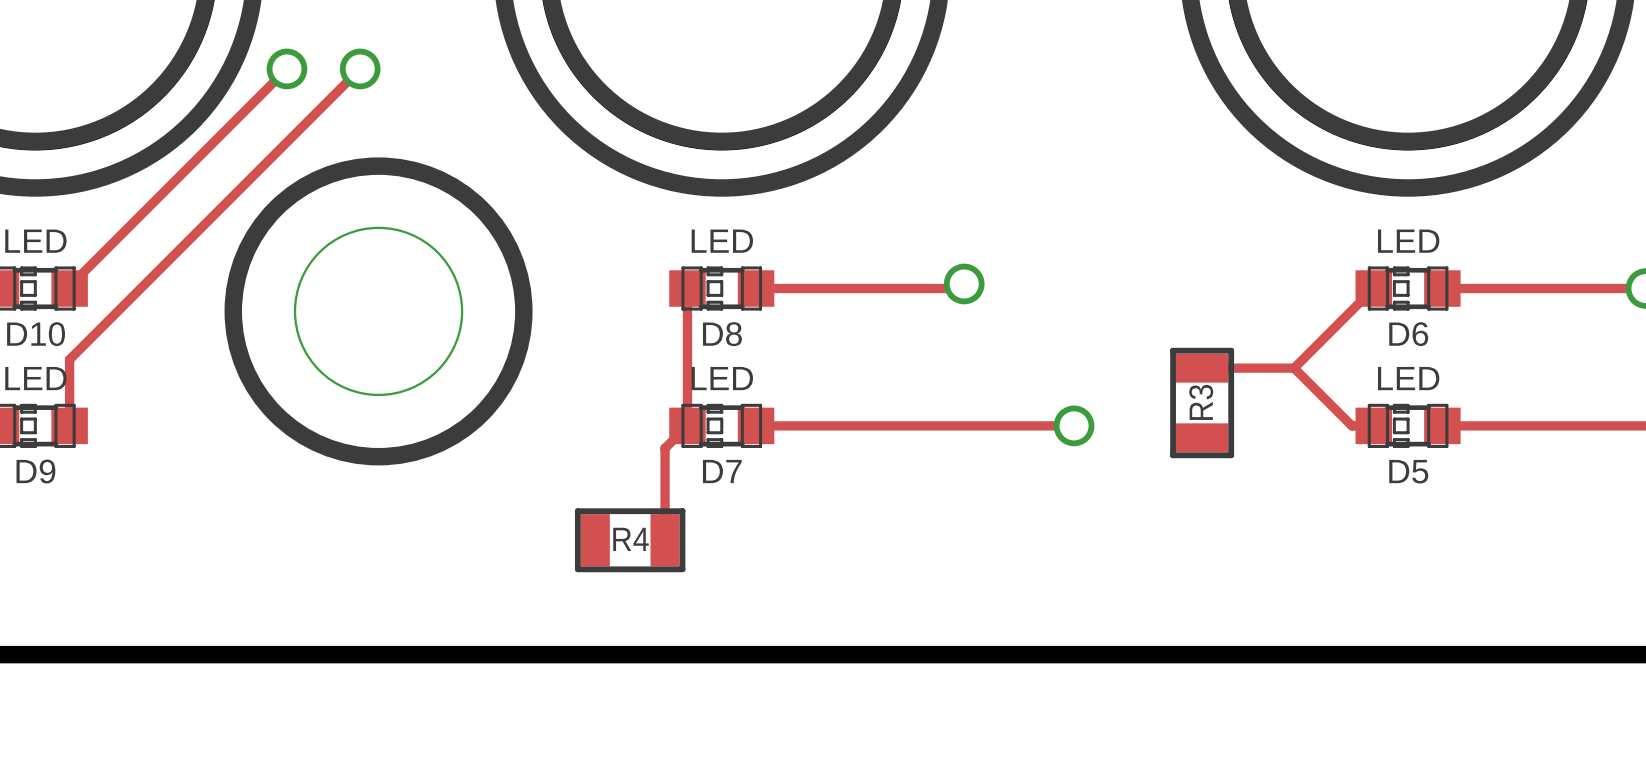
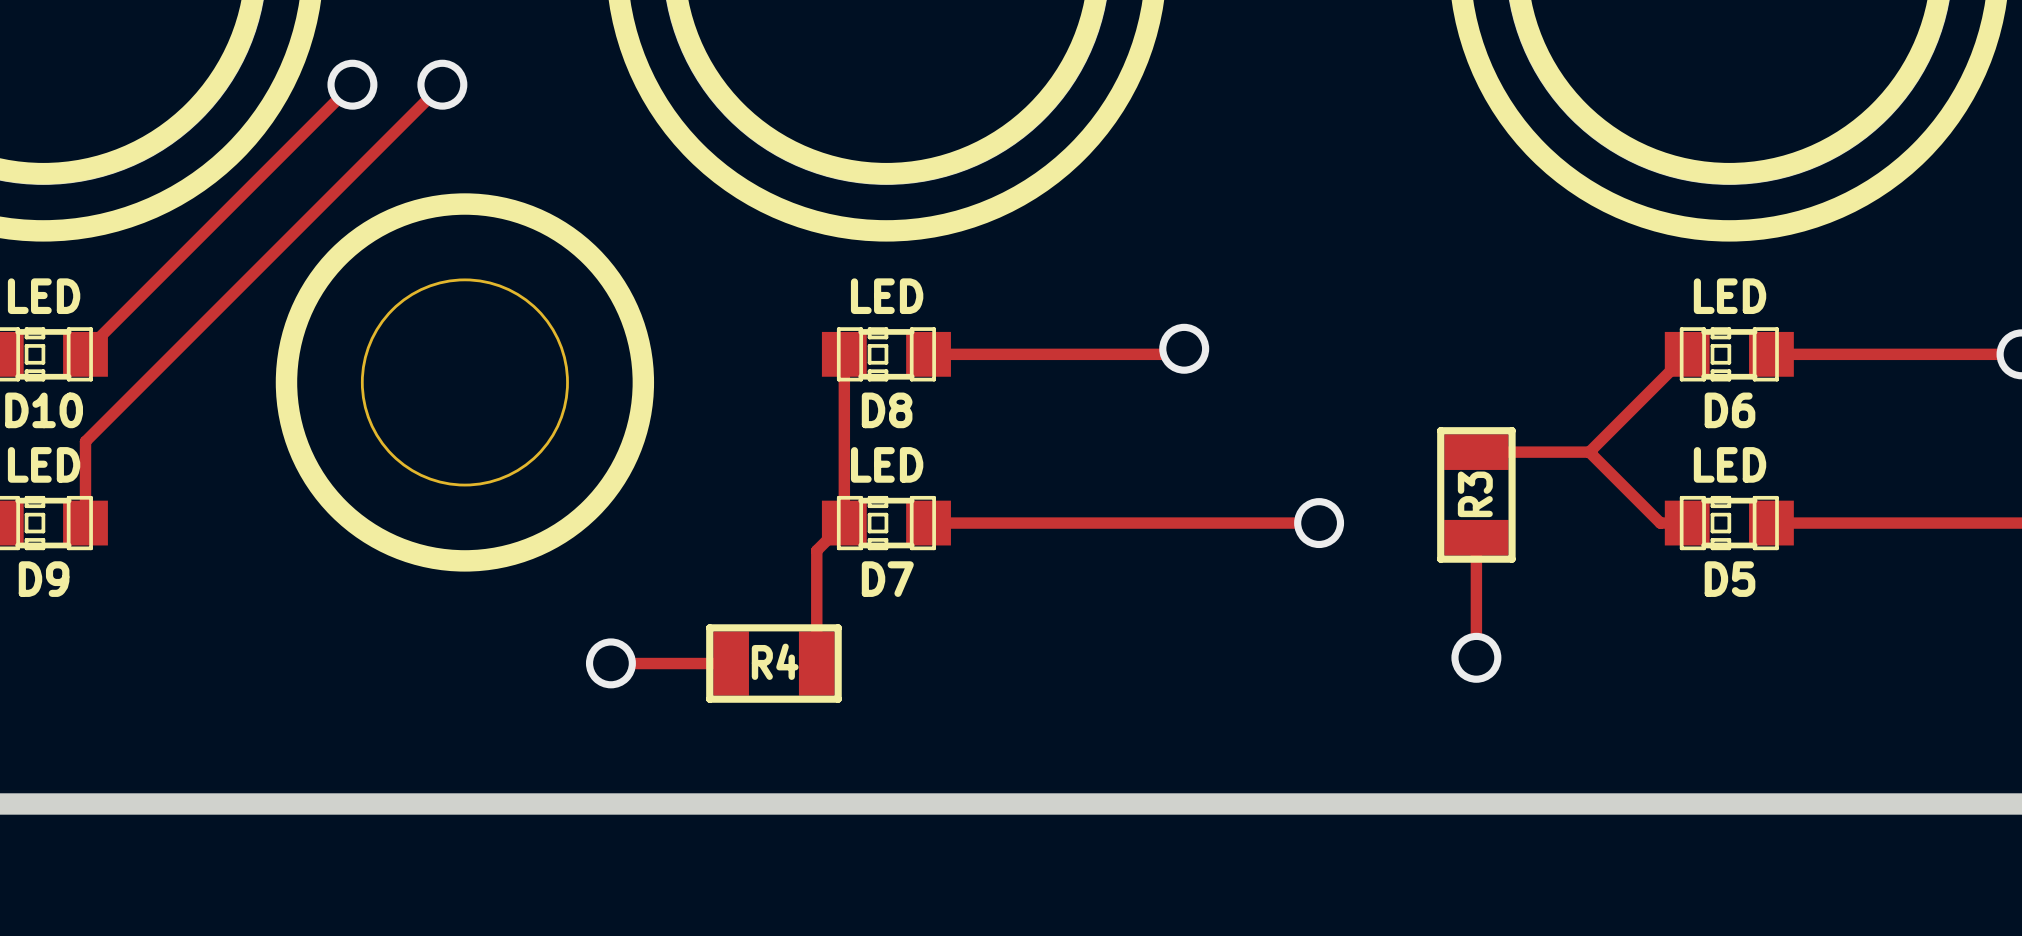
track: none -> (1476, 537) (1476, 657)
via: none -> (1476, 657)
track: none -> (611, 663) (731, 663)
via: none -> (610, 663)

